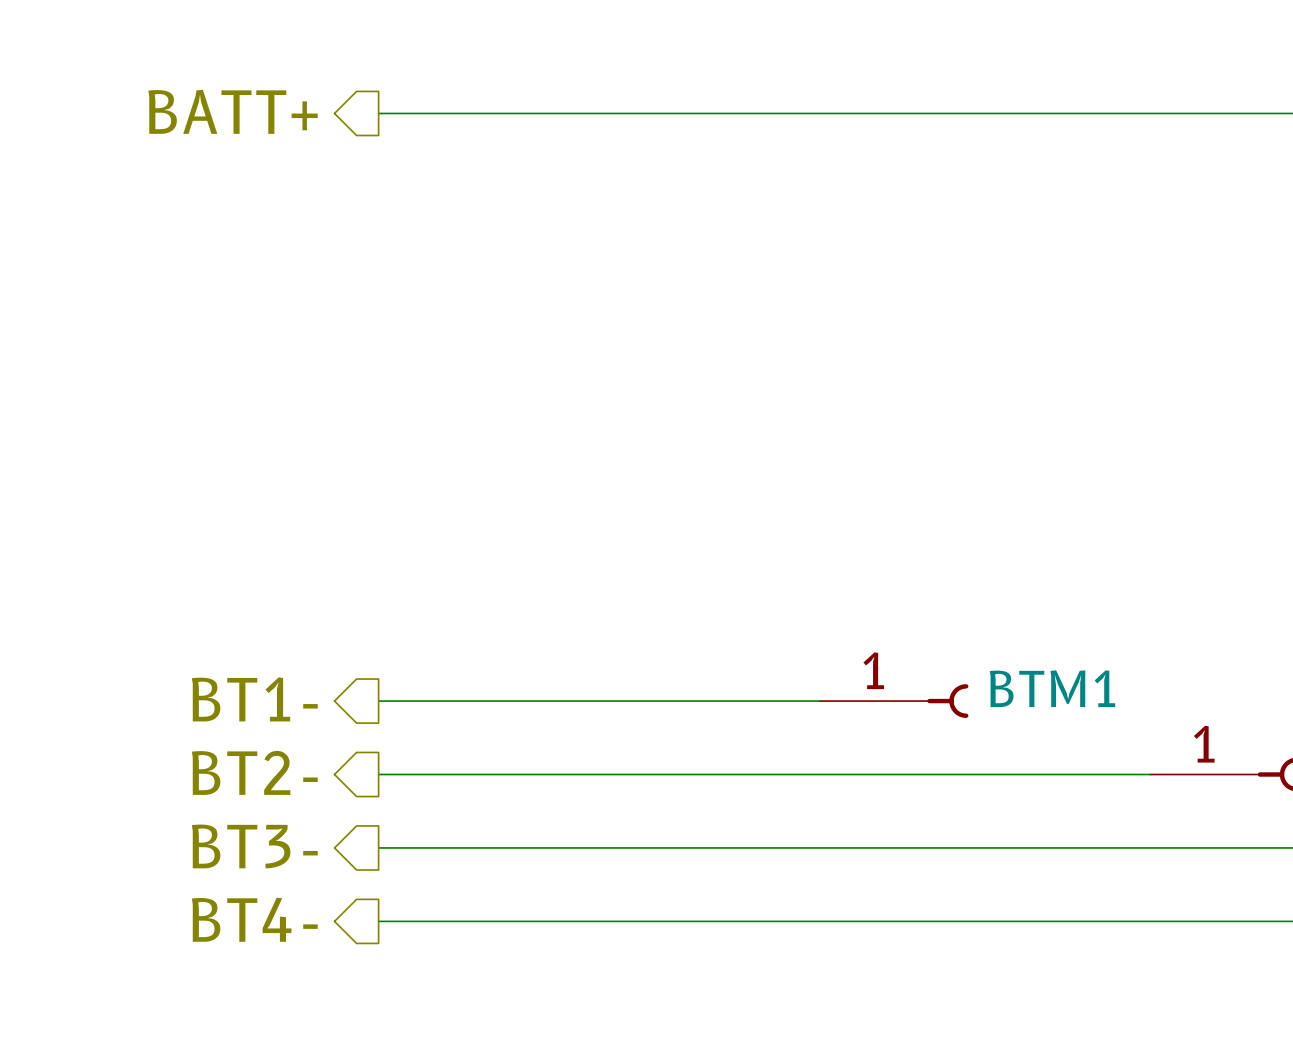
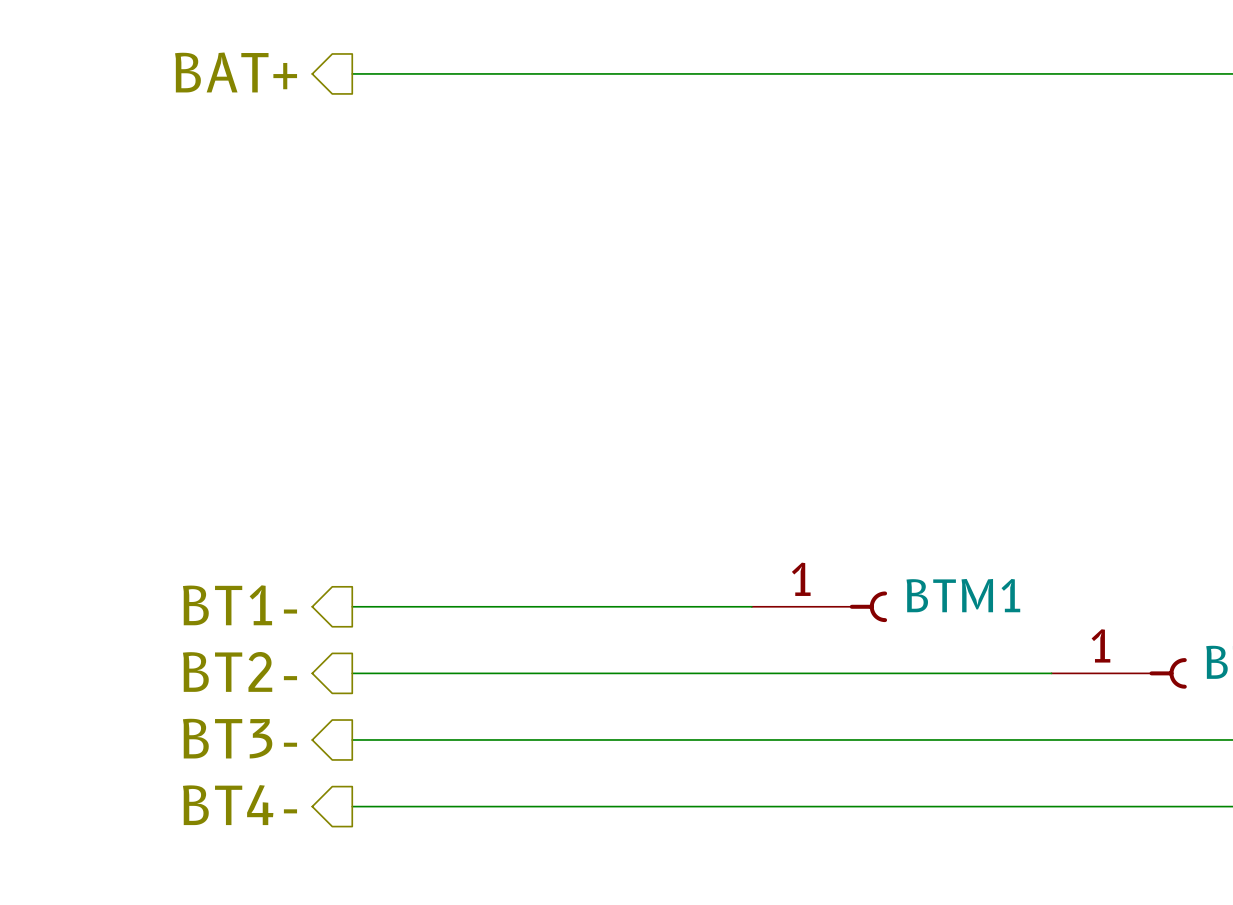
hierarchical label: BATT+ (233, 111) -> BAT+ (236, 72)

